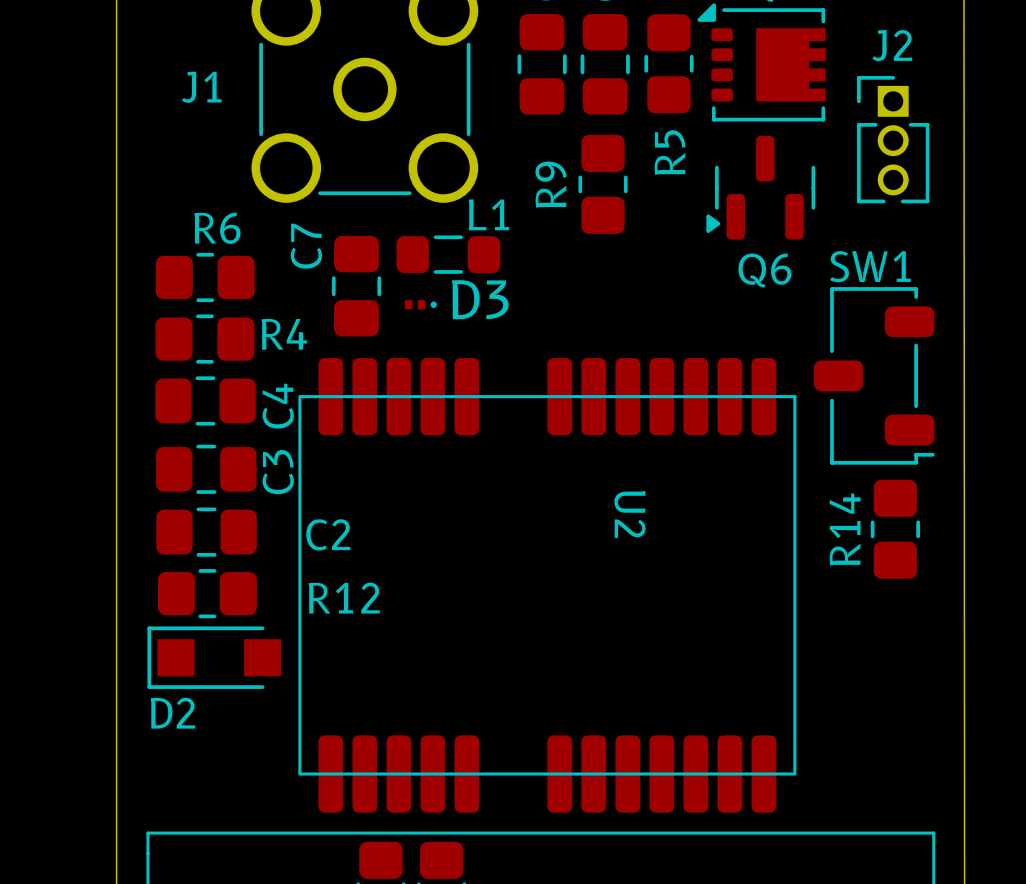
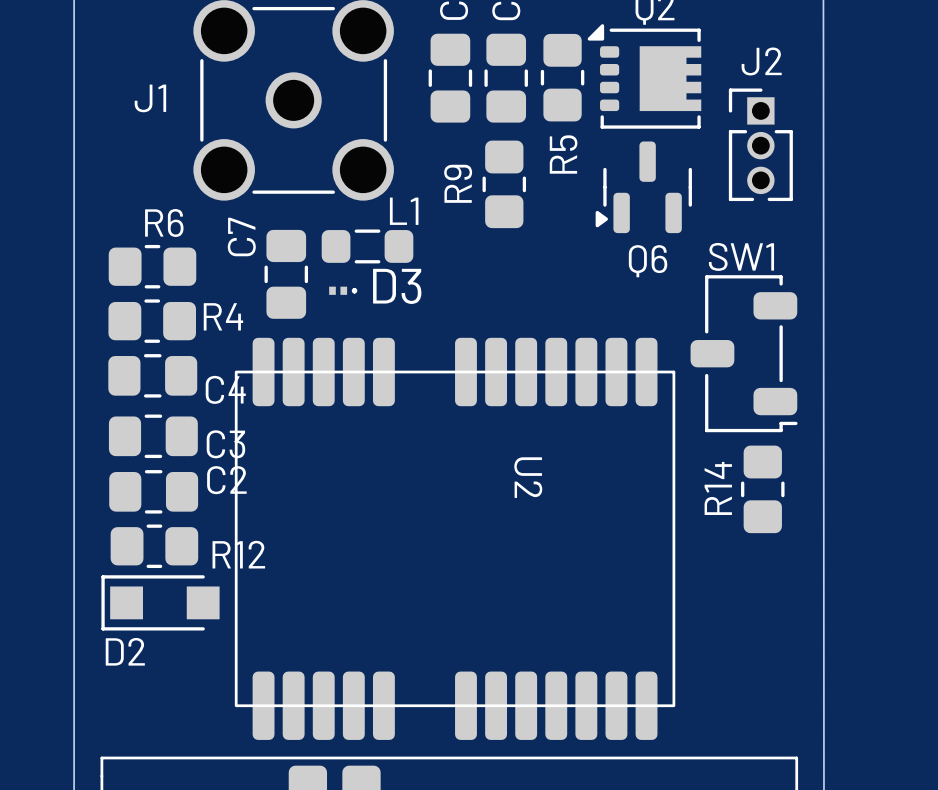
C4 name rotation: 0° (278, 406) -> 90° clockwise (225, 389)
C3 name rotation: 0° (278, 472) -> 90° clockwise (225, 444)
C2 name position: C2 (328, 534) -> C2 (226, 480)
R12 name position: R12 (344, 598) -> R12 (238, 554)

